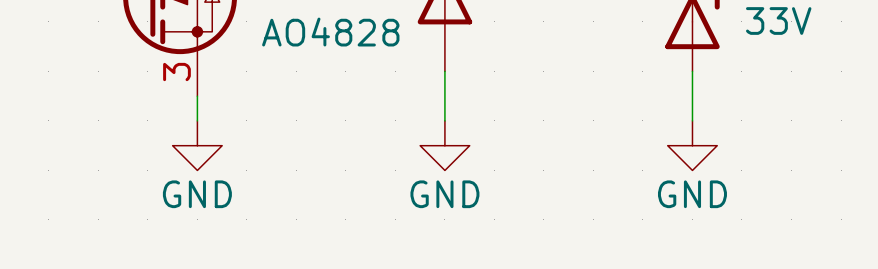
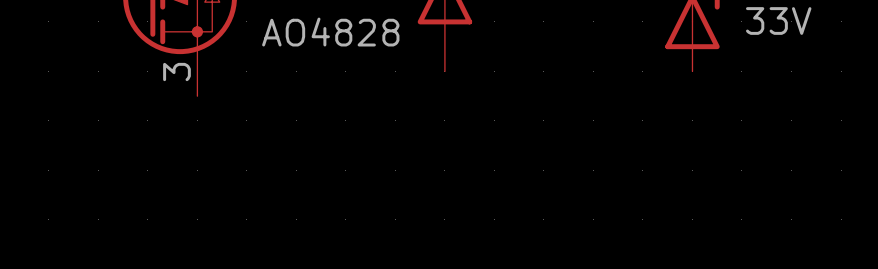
wire: (444, 71) (444, 120) -> none
wire: (692, 71) (692, 120) -> none
wire: (197, 96) (197, 120) -> none
power symbol: GND (197, 145) -> none
power symbol: GND (444, 145) -> none
power symbol: GND (692, 145) -> none

